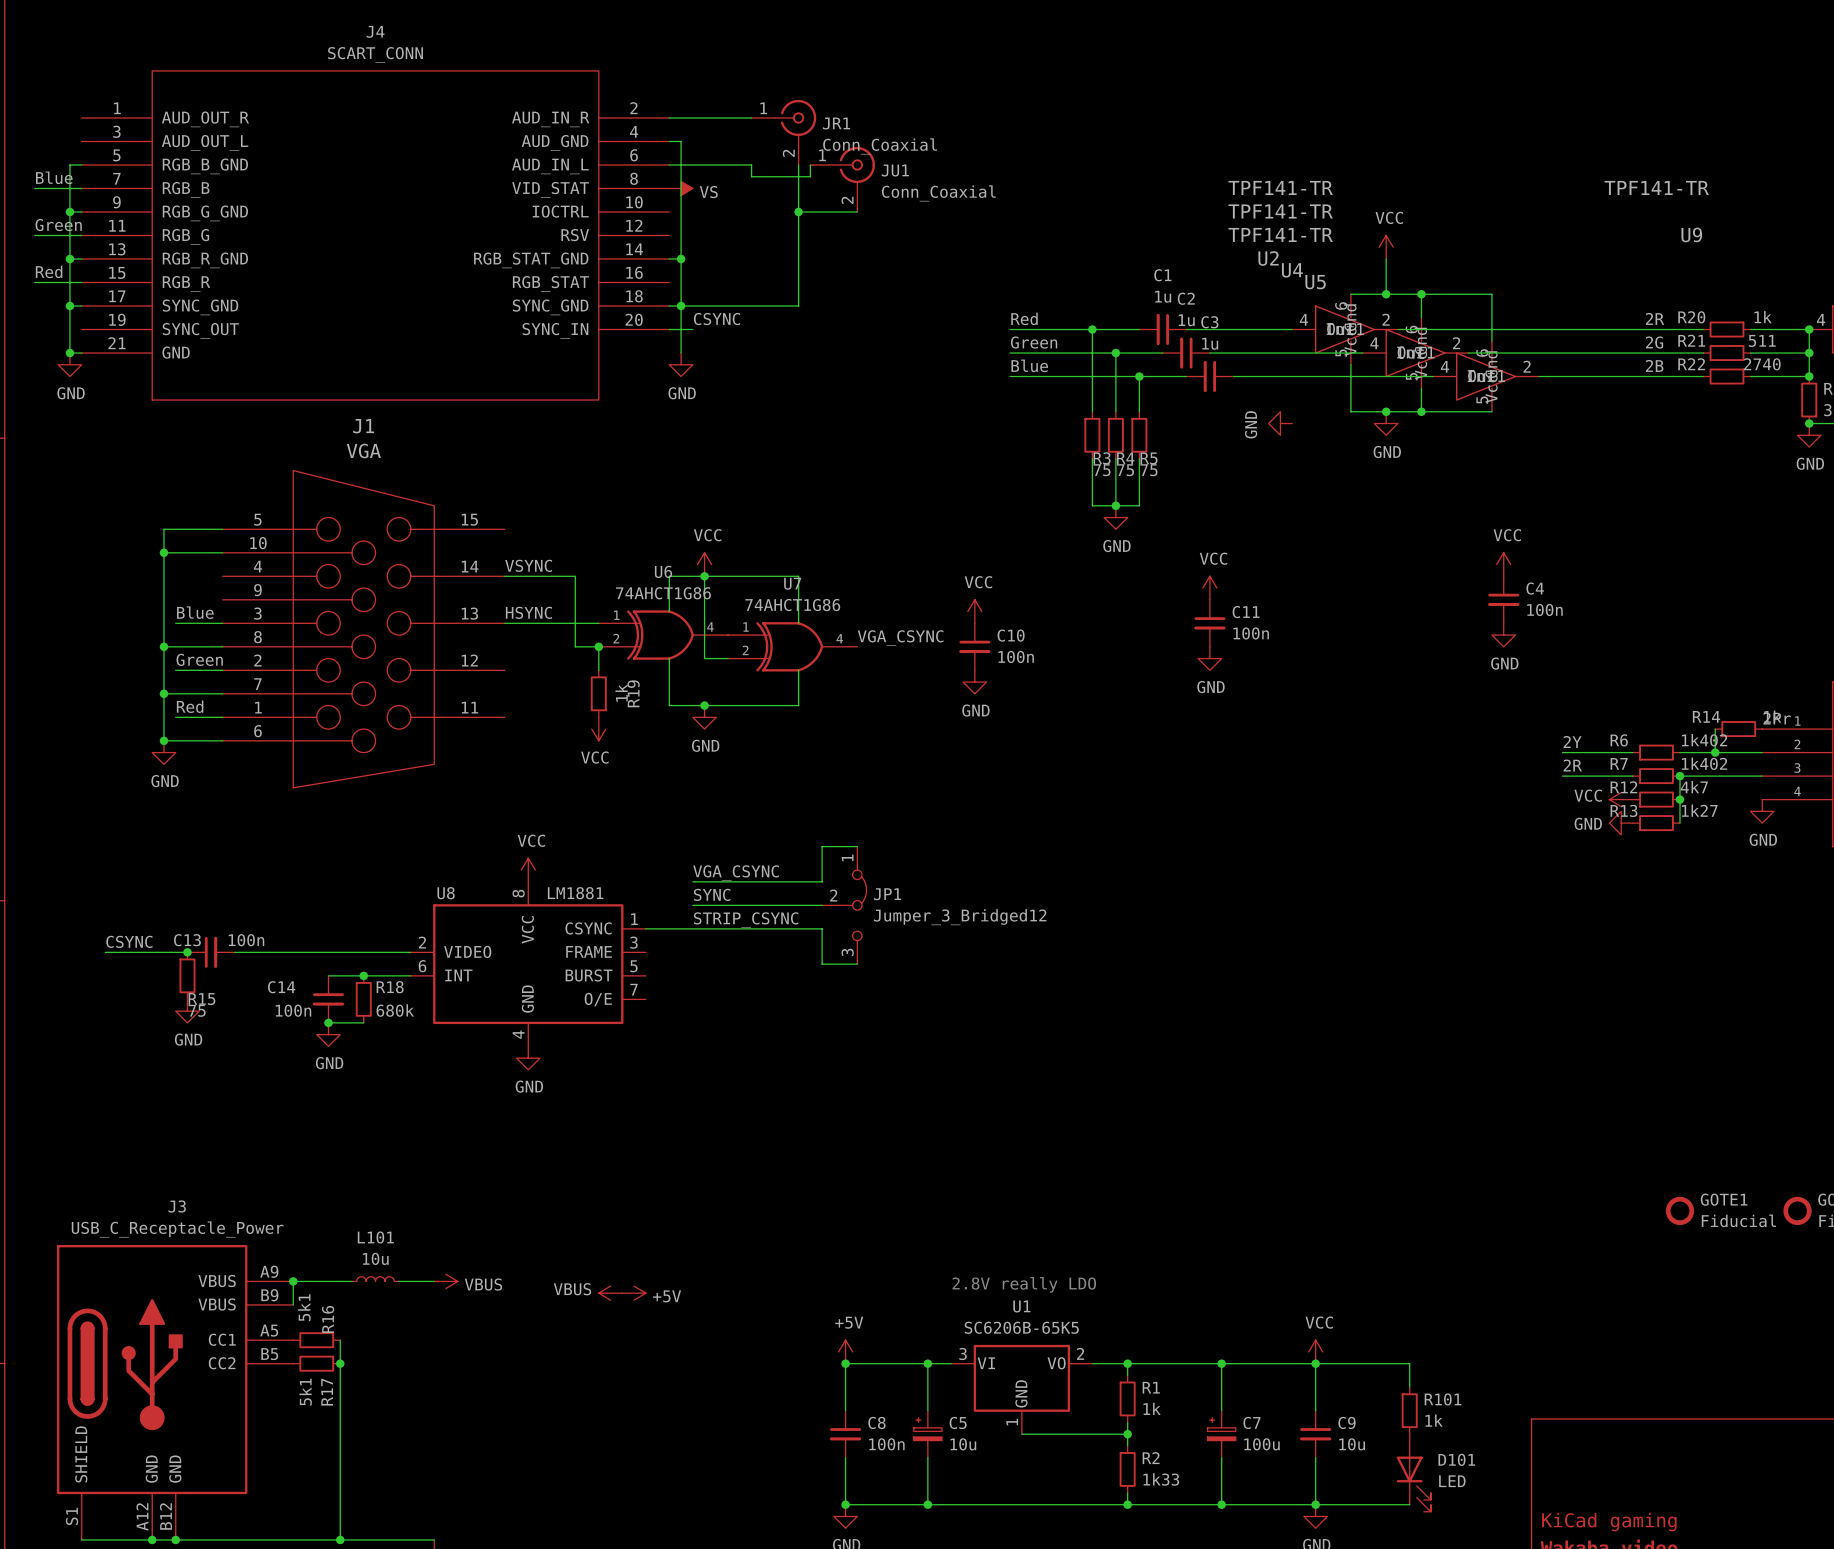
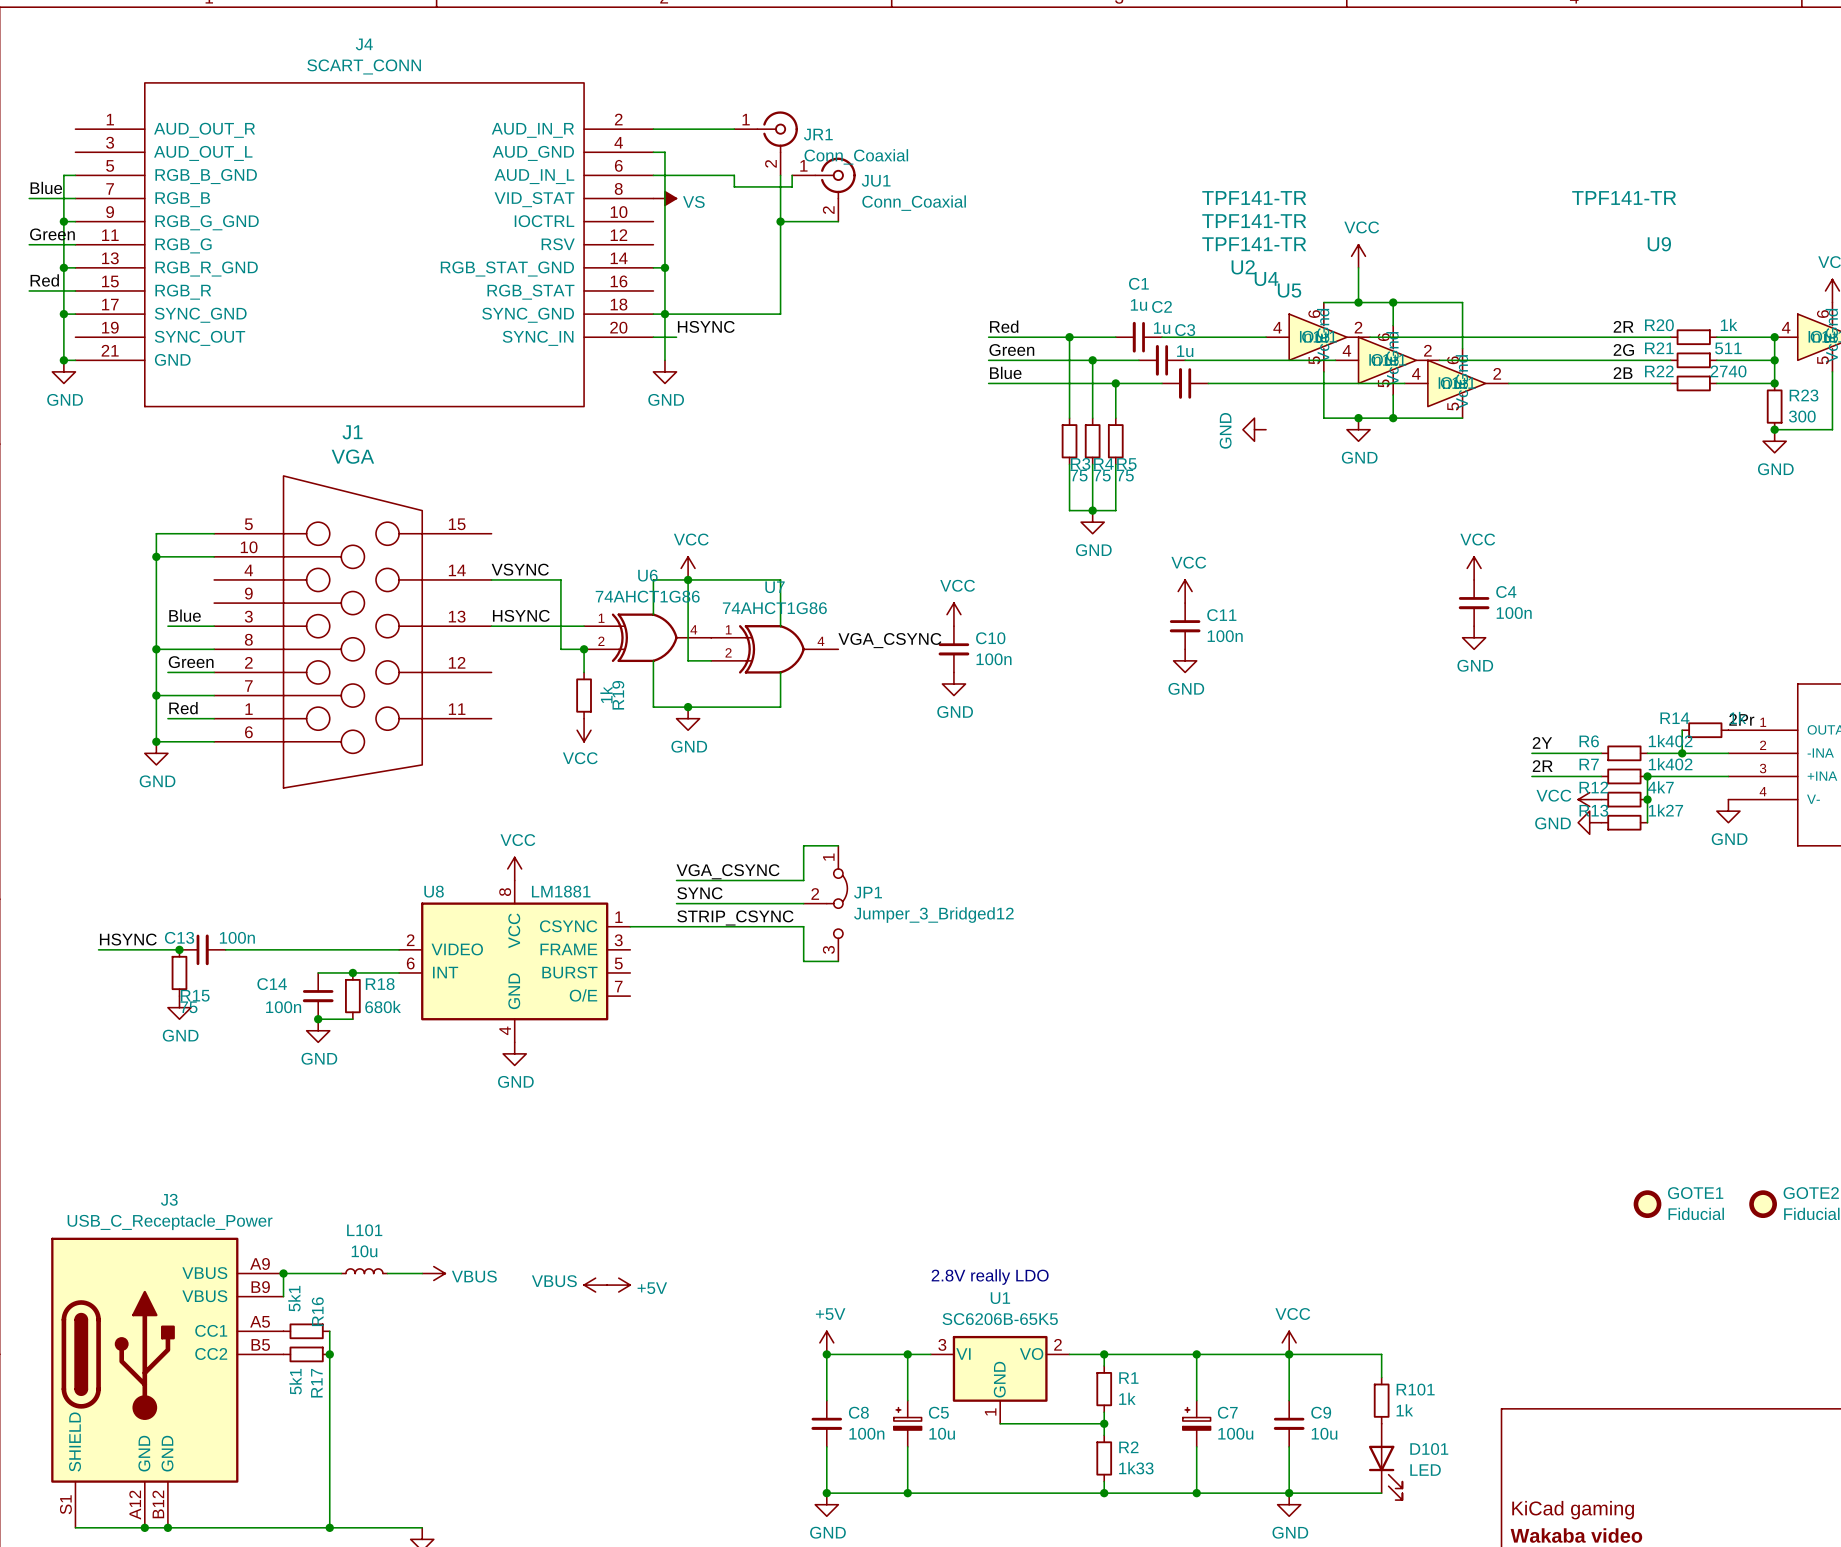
label: CSYNC (716, 319) -> HSYNC (706, 326)
label: CSYNC (129, 941) -> HSYNC (128, 939)

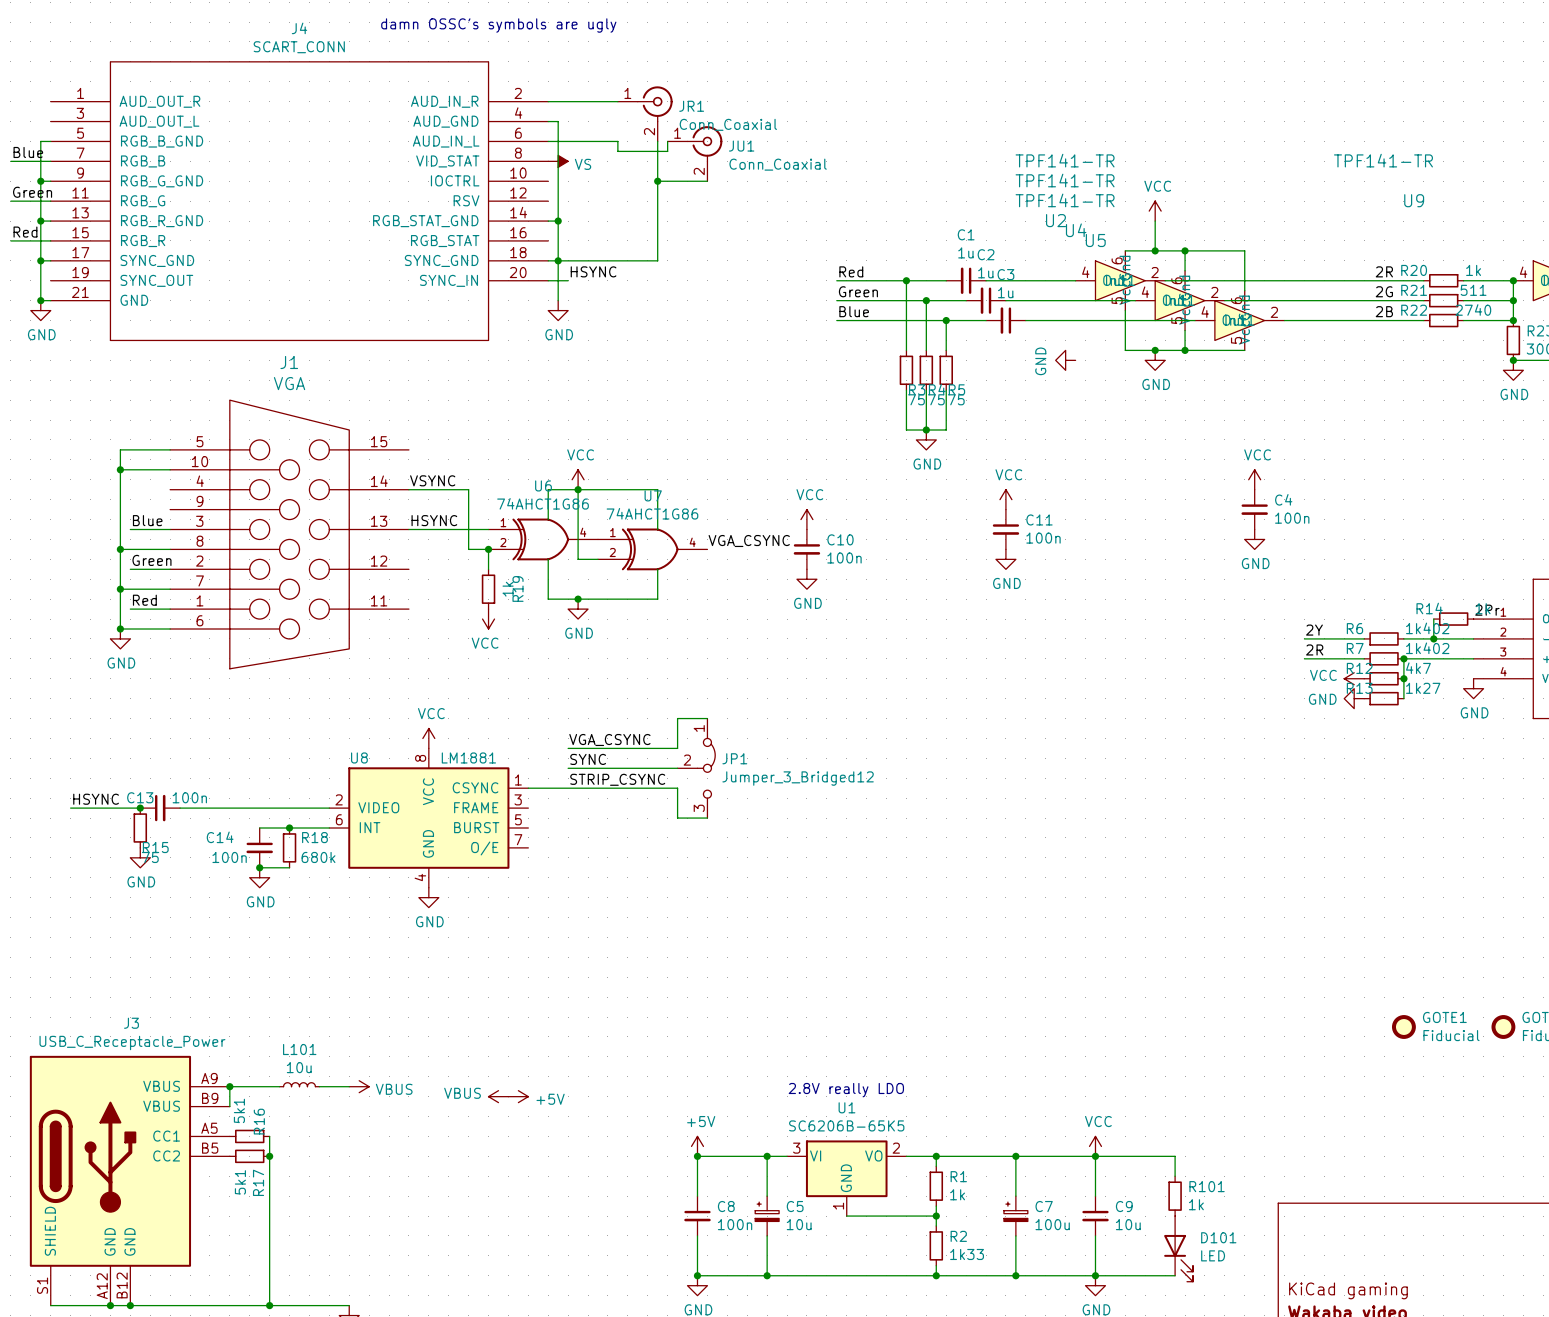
text: none -> damn OSSC's symbols are ugly (498, 25)

